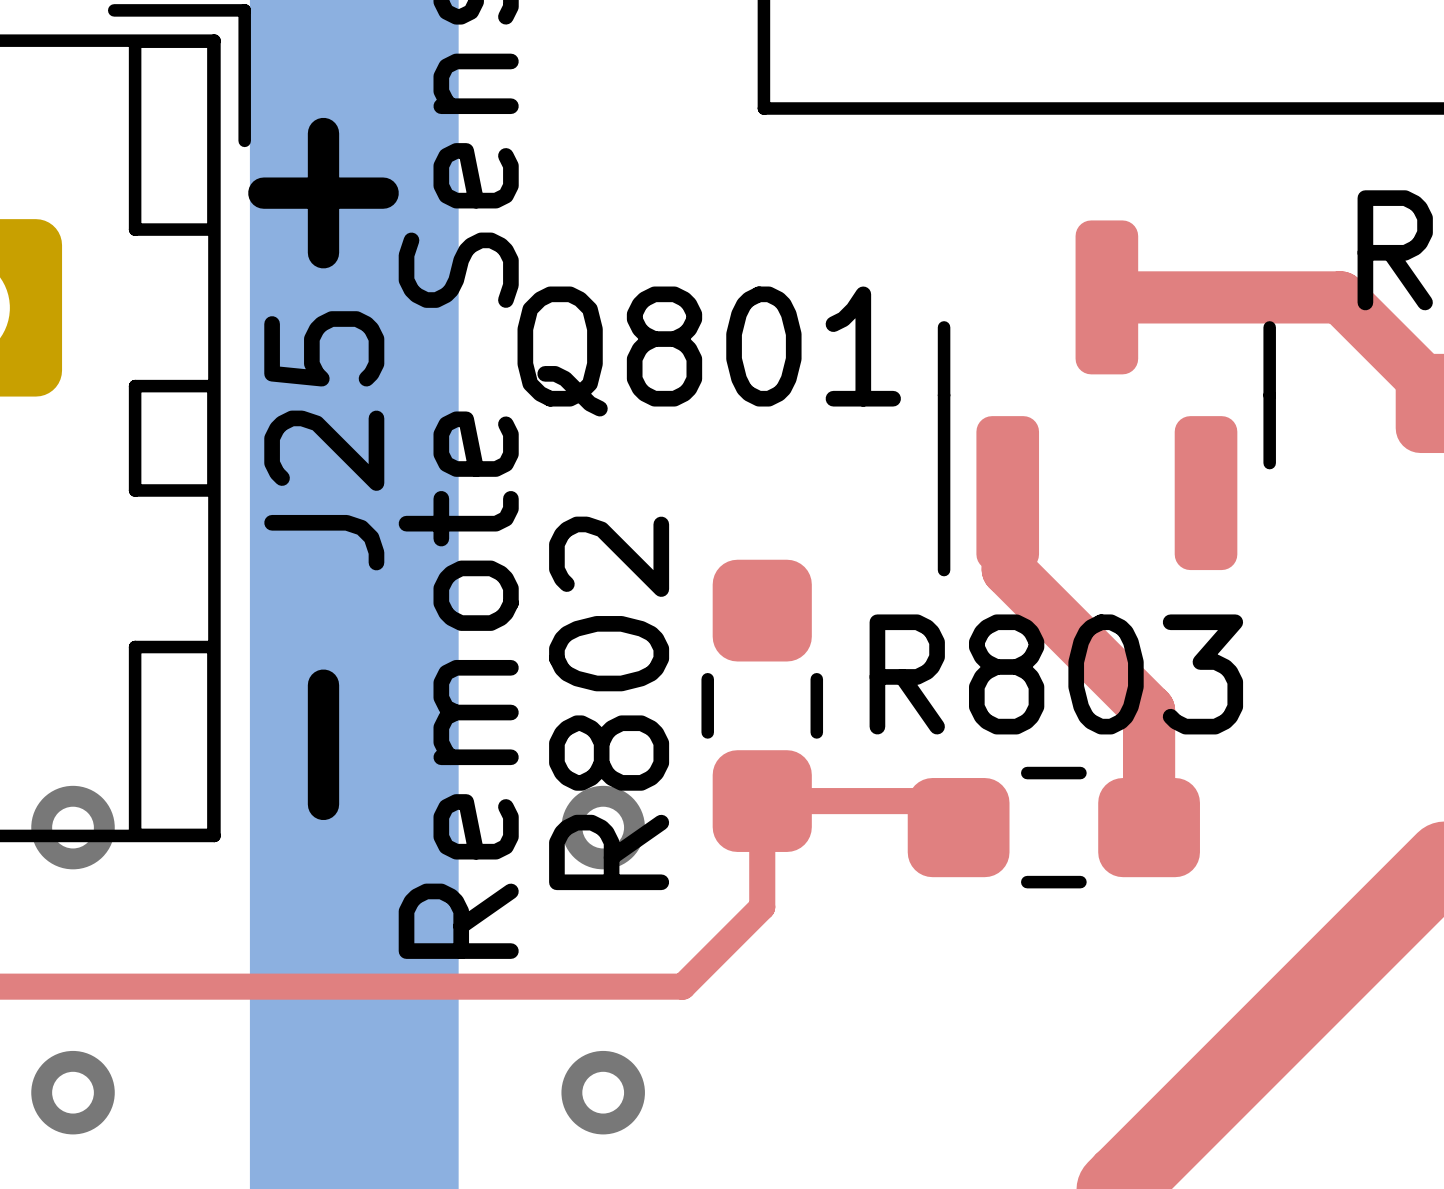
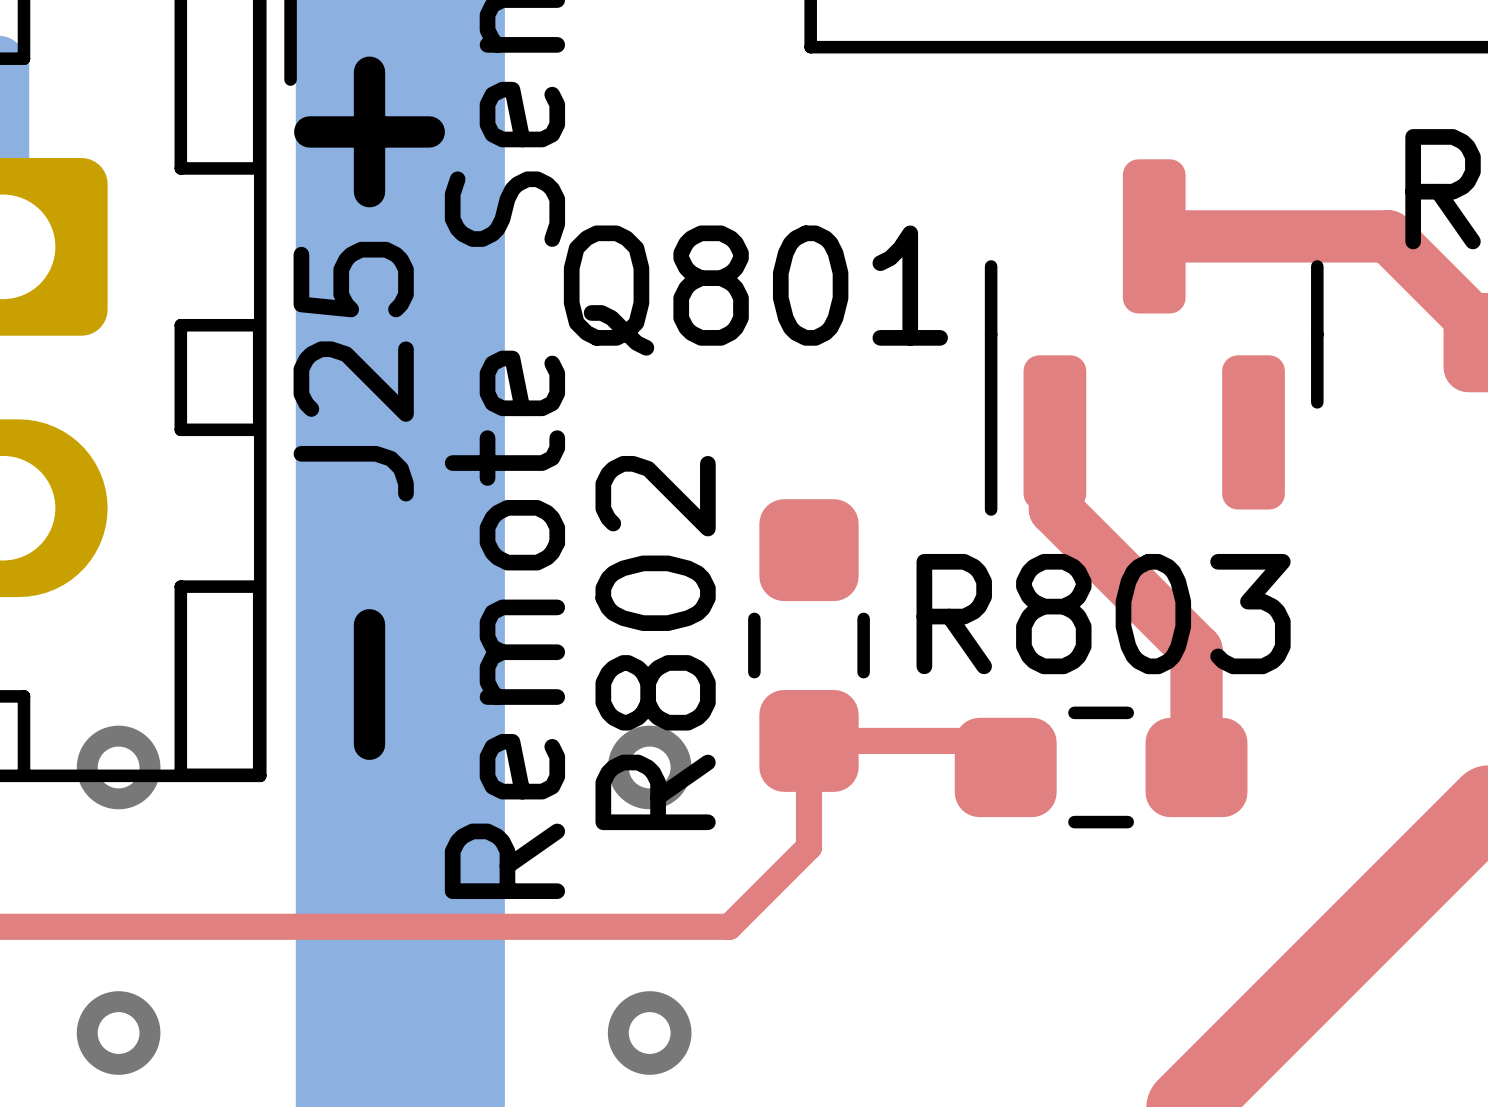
J25 name position: J25 (324, 440) -> J25 (353, 371)

